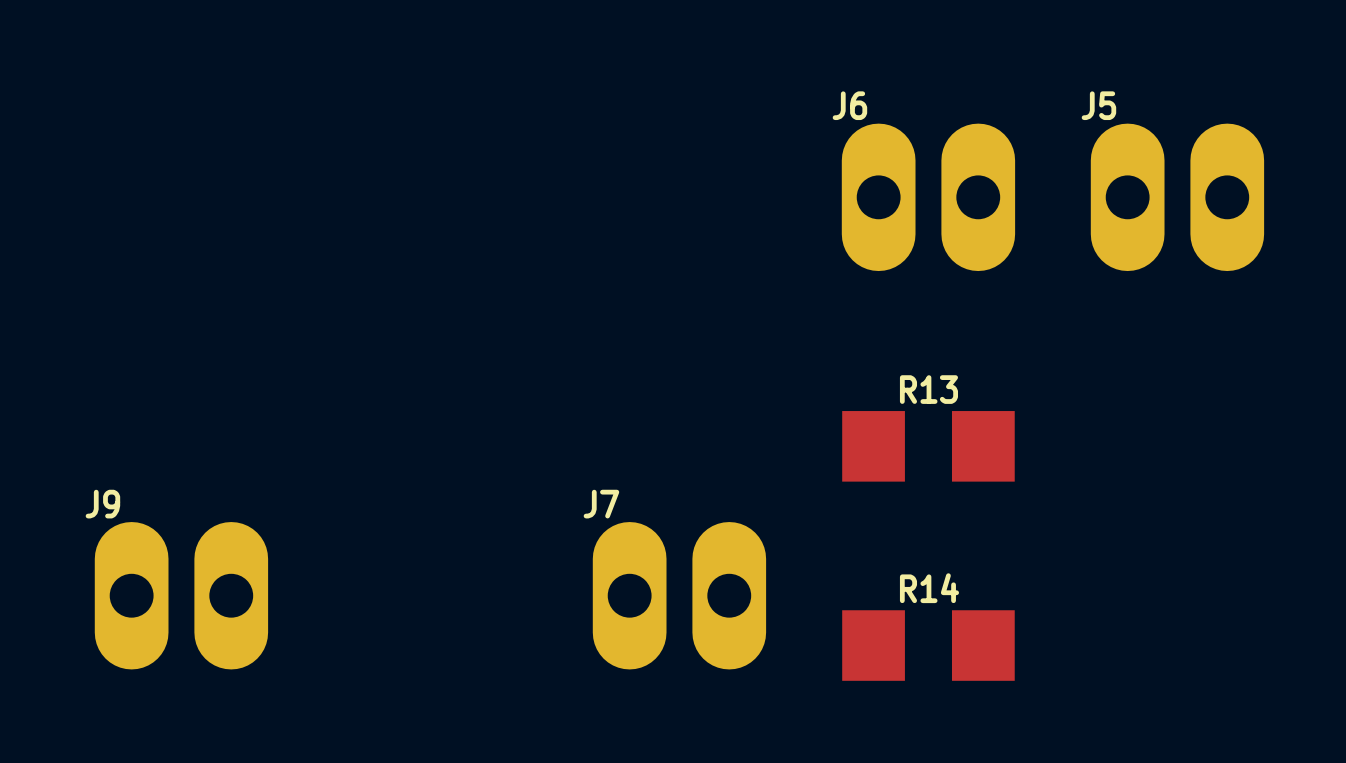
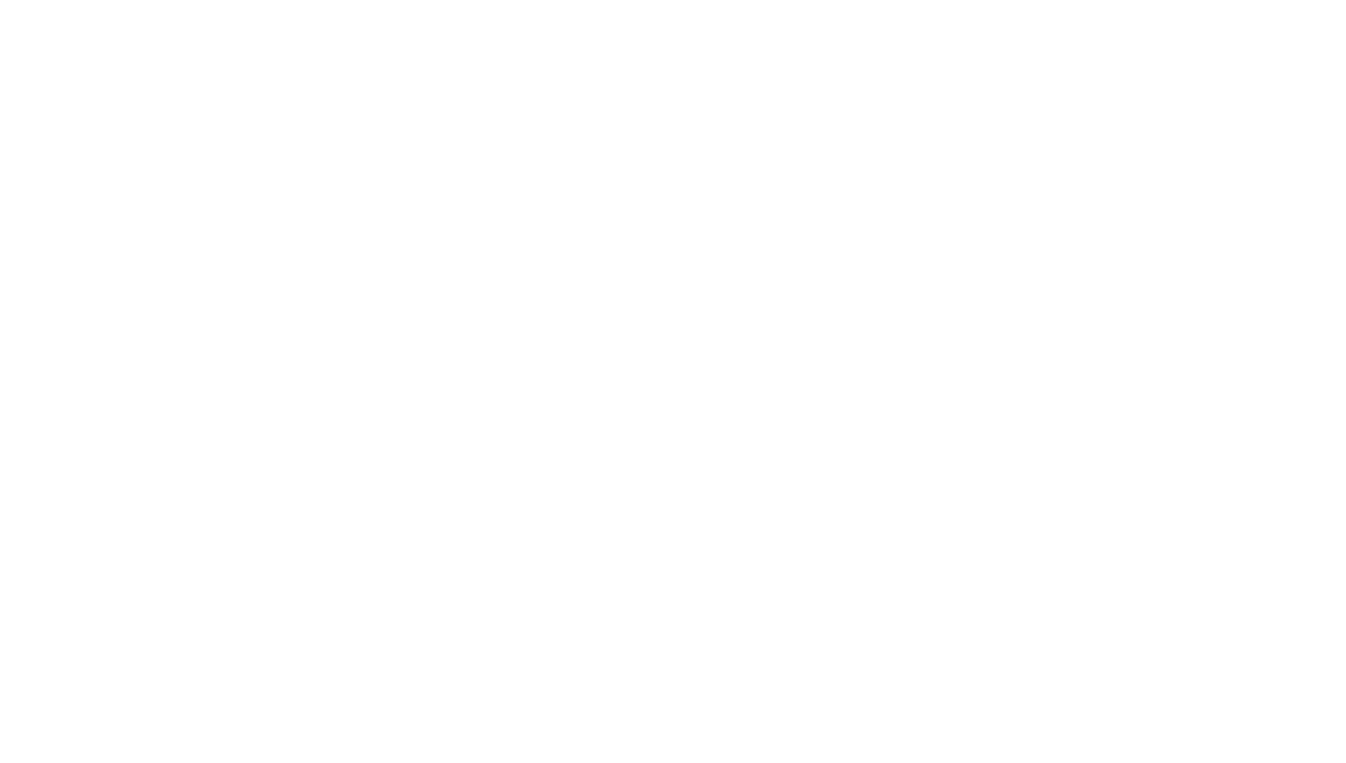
J6: (928, 197) -> none
J5: (1177, 197) -> none
R13: (928, 446) -> none
J9: (181, 595) -> none
J7: (679, 595) -> none
R14: (928, 645) -> none

